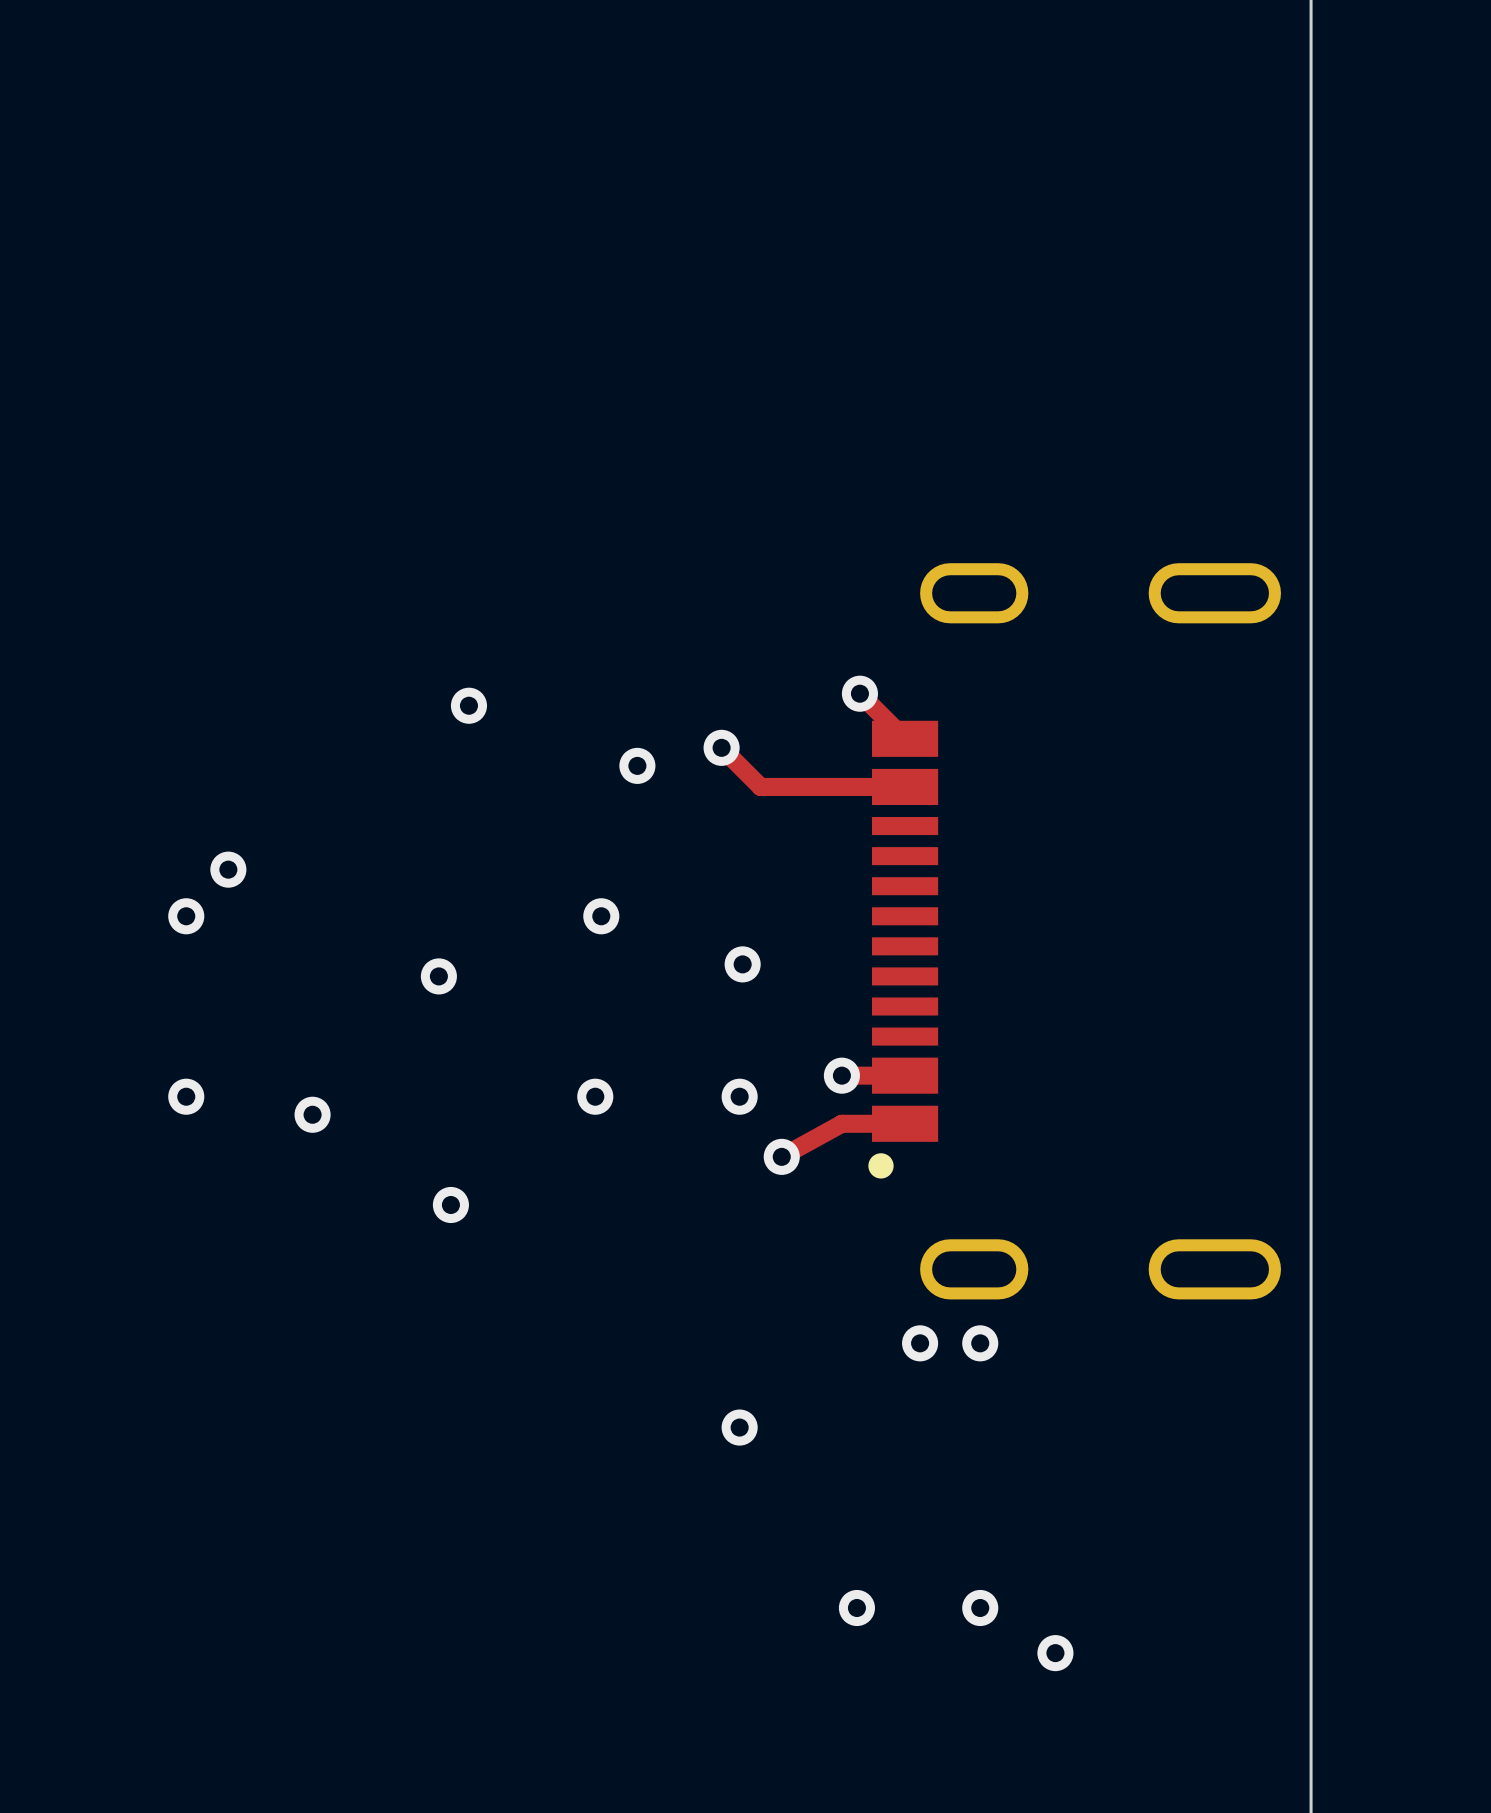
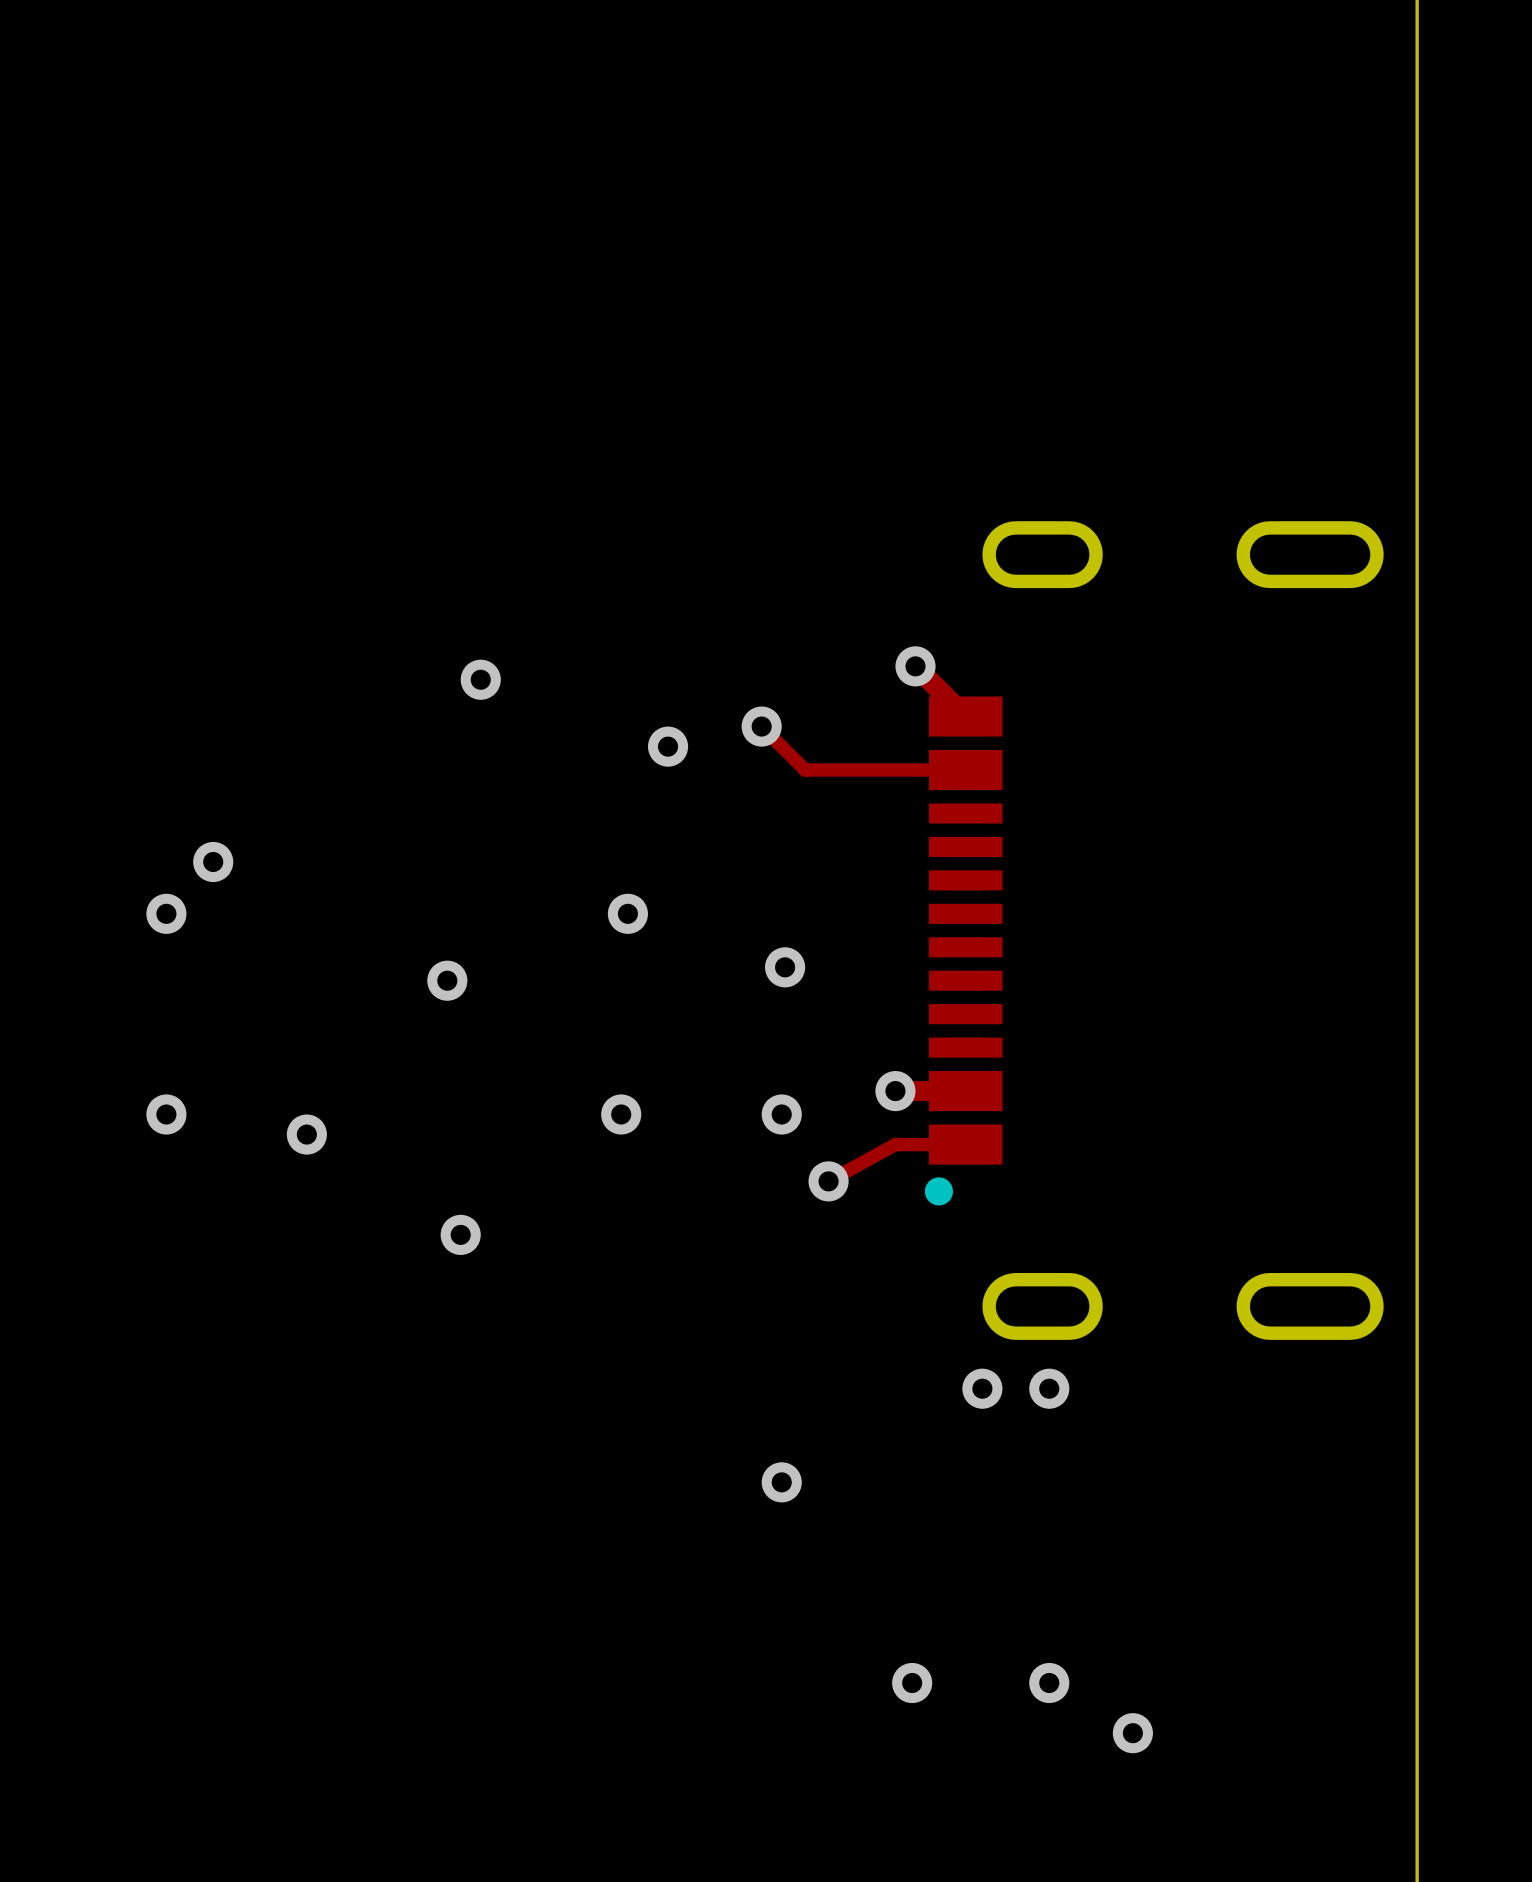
track width: thick (721, 747) (760, 786) (905, 786) -> thin (761, 726) (805, 770) (965, 770)
track width: thick (905, 1123) (841, 1123) (781, 1156) -> thin (965, 1144) (895, 1144) (828, 1181)

